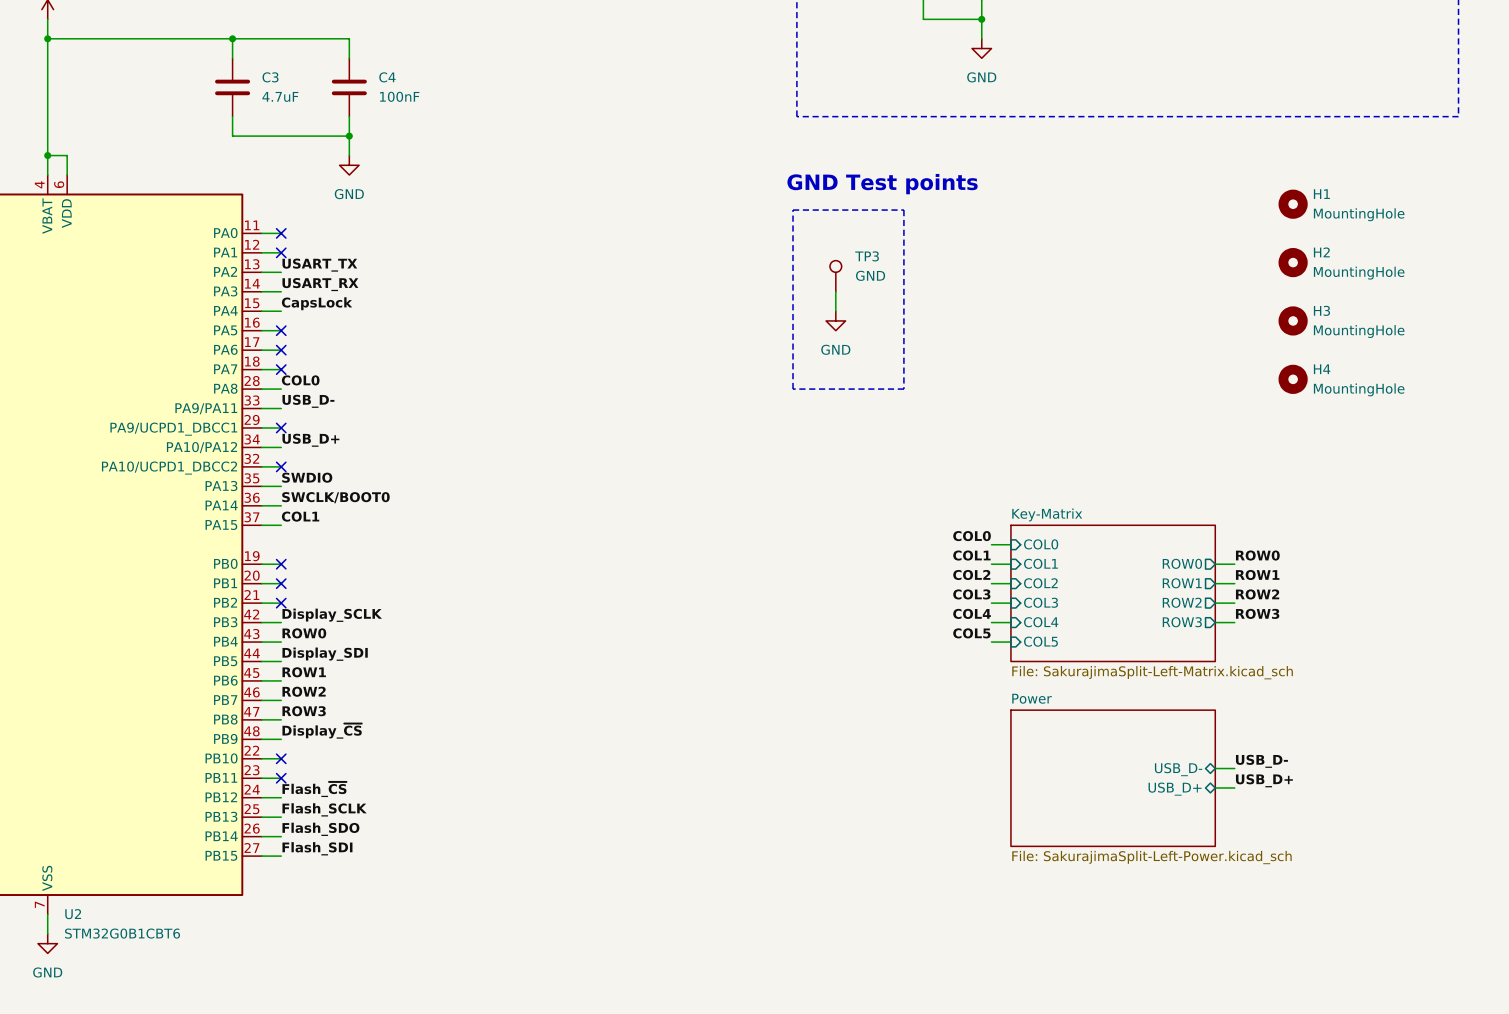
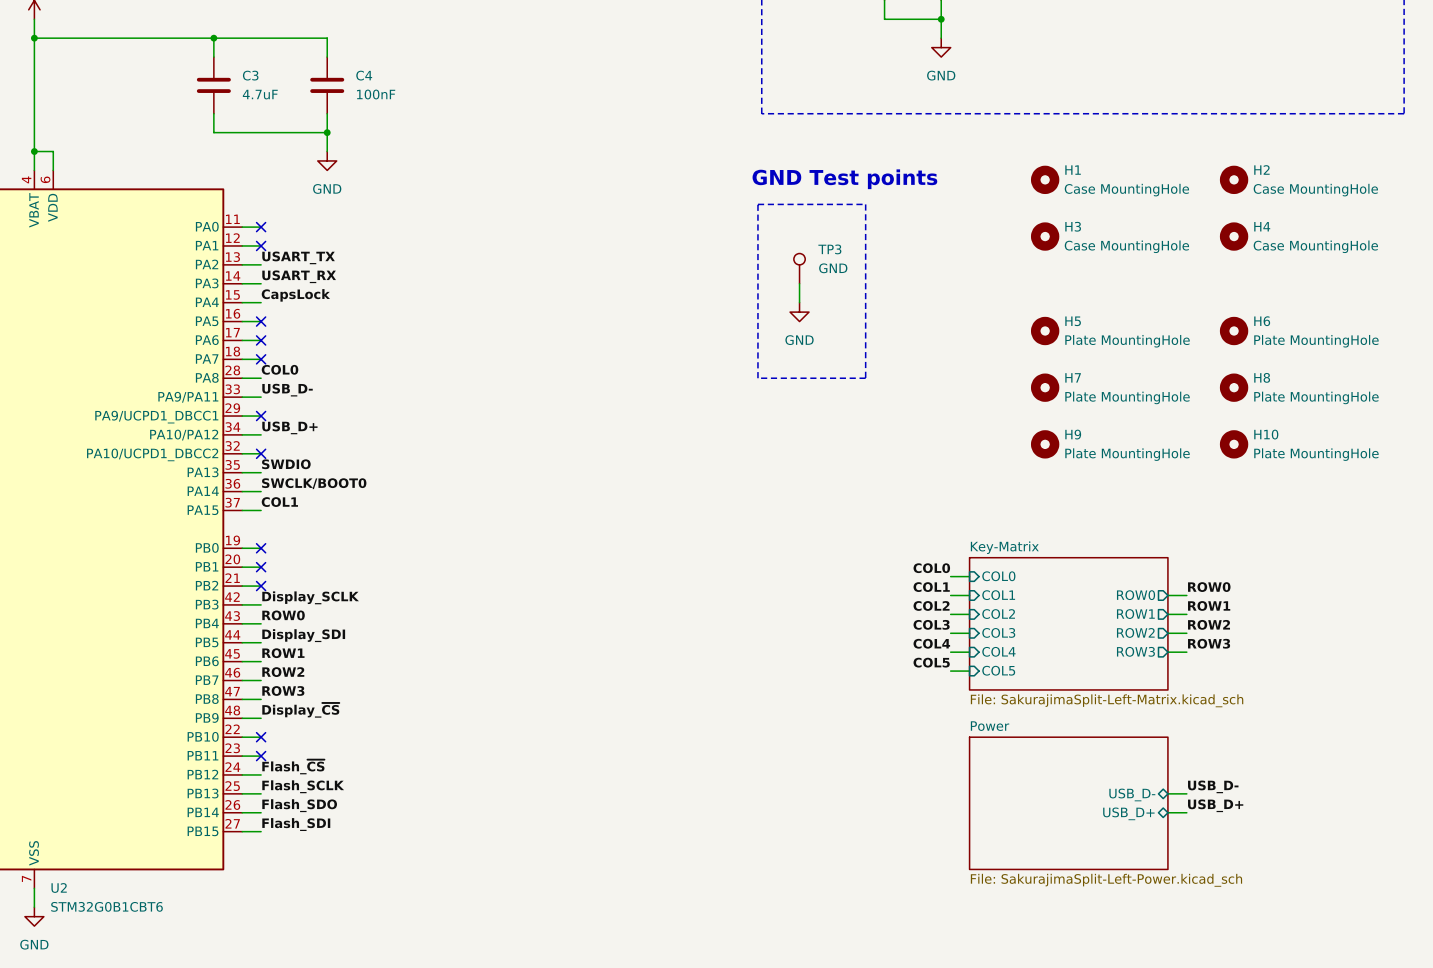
H1 position: (1293, 204) -> (1045, 179)
H1 value: MountingHole (1359, 214) -> Case MountingHole (1126, 190)
H2 position: (1293, 262) -> (1234, 179)
H2 value: MountingHole (1359, 273) -> Case MountingHole (1315, 190)
H3 position: (1293, 320) -> (1045, 236)
H3 value: MountingHole (1359, 331) -> Case MountingHole (1126, 246)
H5: none -> Plate MountingHole (1045, 331)
H6: none -> Plate MountingHole (1234, 331)
H4 position: (1293, 379) -> (1234, 236)
H4 value: MountingHole (1359, 389) -> Case MountingHole (1315, 246)
H7: none -> Plate MountingHole (1045, 387)
H8: none -> Plate MountingHole (1234, 387)
H9: none -> Plate MountingHole (1045, 444)
H10: none -> Plate MountingHole (1234, 444)
label position: COL0 (972, 536) -> COL0 (931, 568)
wire: (991, 544) (1010, 544) -> (950, 576) (969, 576)
sheet pin position: COL0 (1041, 544) -> COL0 (998, 576)
label position: COL1 (971, 555) -> COL1 (931, 587)
label position: ROW0 (1257, 555) -> ROW0 (1209, 587)
sheet pin position: COL1 (1040, 563) -> COL1 (998, 595)
sheet pin position: ROW0 (1182, 563) -> ROW0 (1136, 595)
wire: (991, 564) (1010, 564) -> (950, 595) (969, 595)
wire: (1215, 564) (1234, 564) -> (1167, 595) (1186, 595)
label position: COL2 (971, 574) -> COL2 (931, 605)
label position: ROW1 (1257, 574) -> ROW1 (1209, 605)
wire: (991, 583) (1010, 583) -> (950, 614) (969, 614)
sheet pin position: COL2 (1040, 583) -> COL2 (998, 614)
sheet pin position: ROW1 (1182, 583) -> ROW1 (1135, 614)
wire: (1215, 583) (1234, 583) -> (1167, 614) (1186, 614)
sheet Key-Matrix position: (1113, 593) -> (1068, 623)
label position: COL3 (971, 594) -> COL3 (931, 624)
label position: ROW2 (1257, 594) -> ROW2 (1209, 624)
sheet pin position: COL3 (1041, 602) -> COL3 (998, 632)
sheet pin position: ROW2 (1182, 602) -> ROW2 (1135, 632)
wire: (991, 603) (1010, 603) -> (950, 633) (969, 633)
wire: (1215, 603) (1234, 603) -> (1167, 633) (1186, 633)
label position: COL4 (972, 613) -> COL4 (931, 643)
label position: ROW3 (1257, 613) -> ROW3 (1209, 643)
wire: (991, 622) (1010, 622) -> (950, 652) (969, 652)
sheet pin position: COL4 (1041, 622) -> COL4 (998, 651)
sheet pin position: ROW3 (1182, 622) -> ROW3 (1135, 651)
wire: (1215, 622) (1234, 622) -> (1167, 652) (1186, 652)
label position: COL5 (971, 633) -> COL5 (931, 662)
sheet pin position: COL5 (1040, 641) -> COL5 (998, 670)
wire: (991, 642) (1010, 642) -> (950, 671) (969, 671)
label position: USB_D- (1261, 761) -> USB_D- (1213, 786)
wire: (1215, 768) (1234, 768) -> (1167, 793) (1186, 793)
sheet pin position: USB_D- (1178, 769) -> USB_D- (1132, 794)
sheet Power position: (1113, 778) -> (1068, 803)
label position: USB_D+ (1264, 780) -> USB_D+ (1215, 805)
wire: (1215, 787) (1234, 787) -> (1167, 812) (1186, 812)
sheet pin position: USB_D+ (1175, 789) -> USB_D+ (1128, 813)

